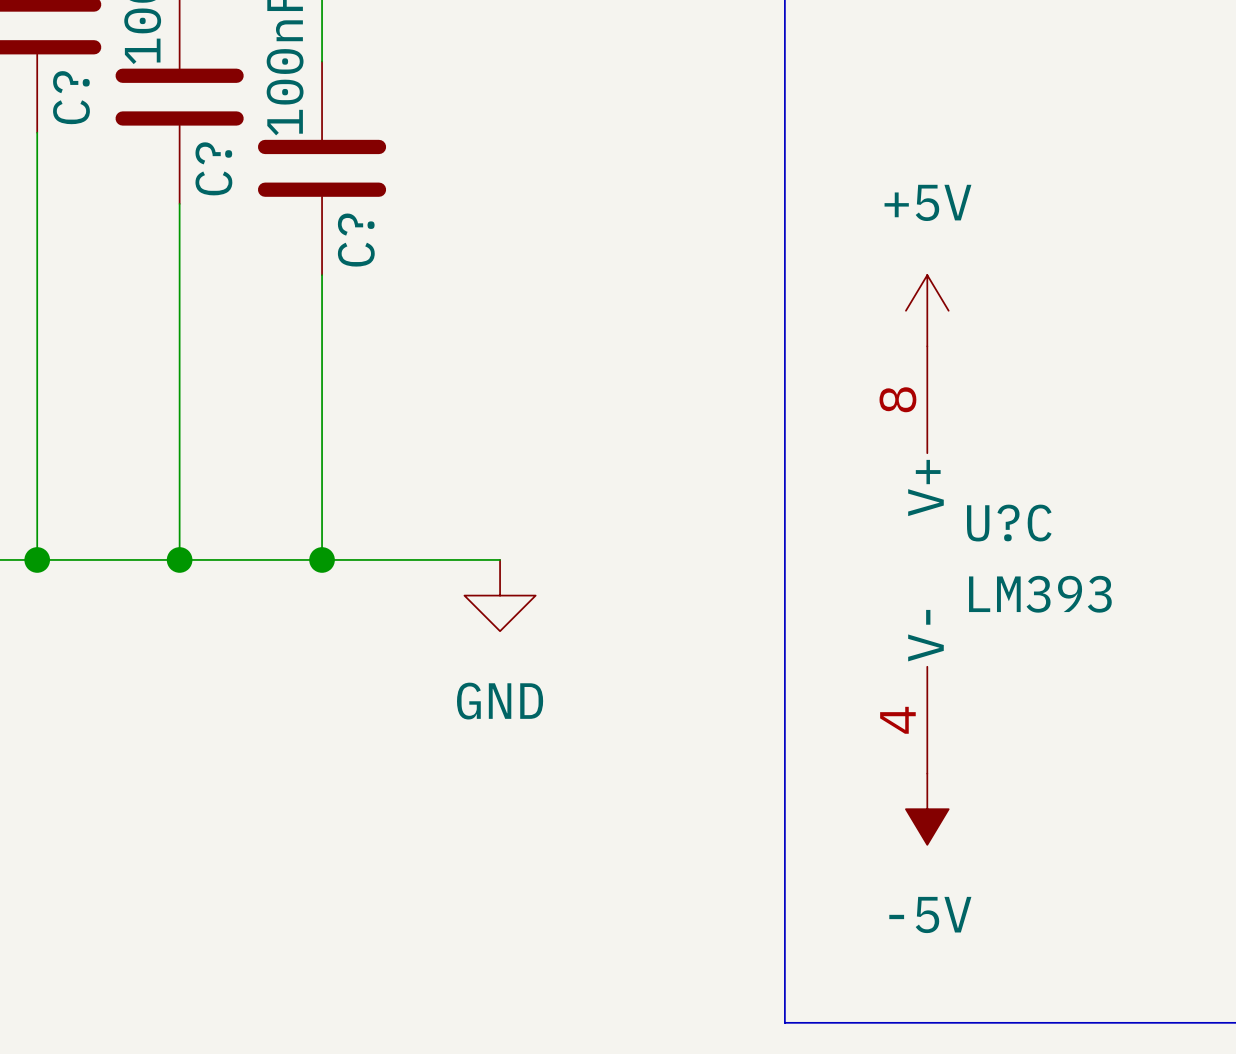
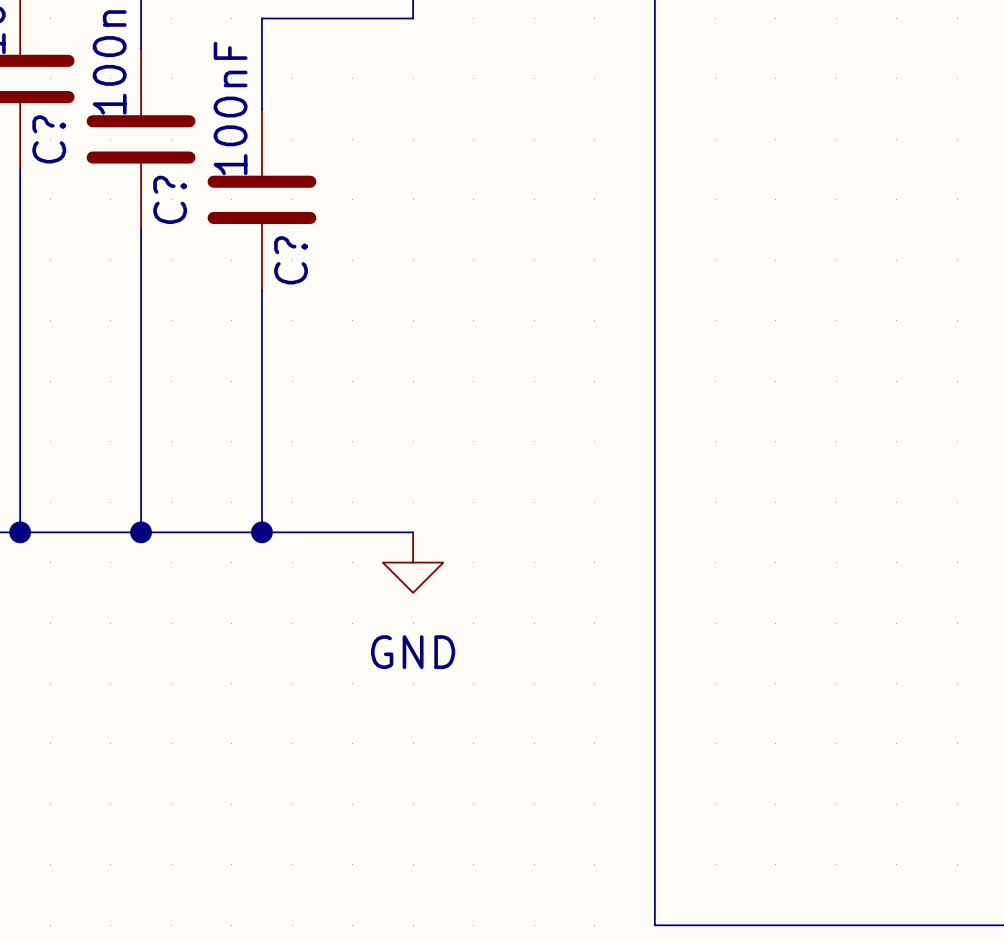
power symbol: +5V (927, 310) -> none
U?C: LM393 (927, 559) -> none
power symbol: -5V (927, 809) -> none

